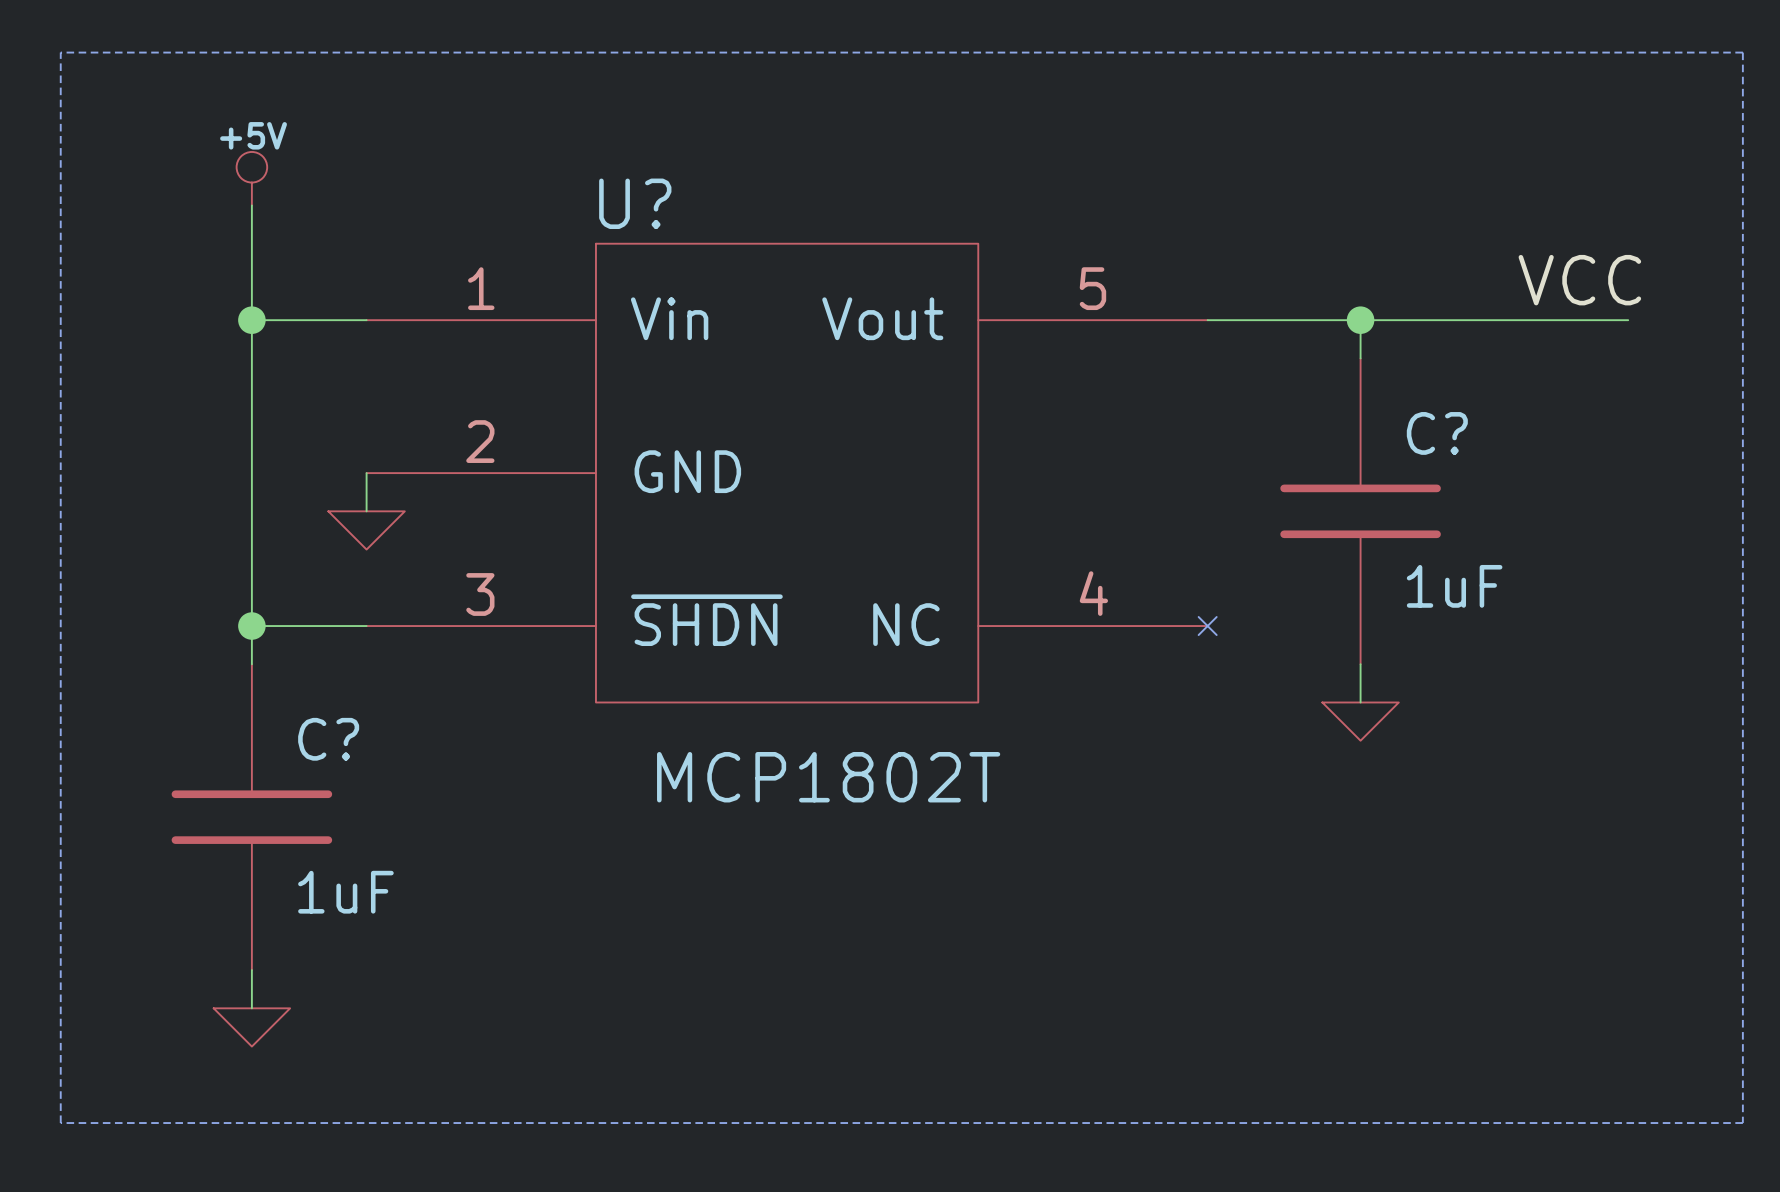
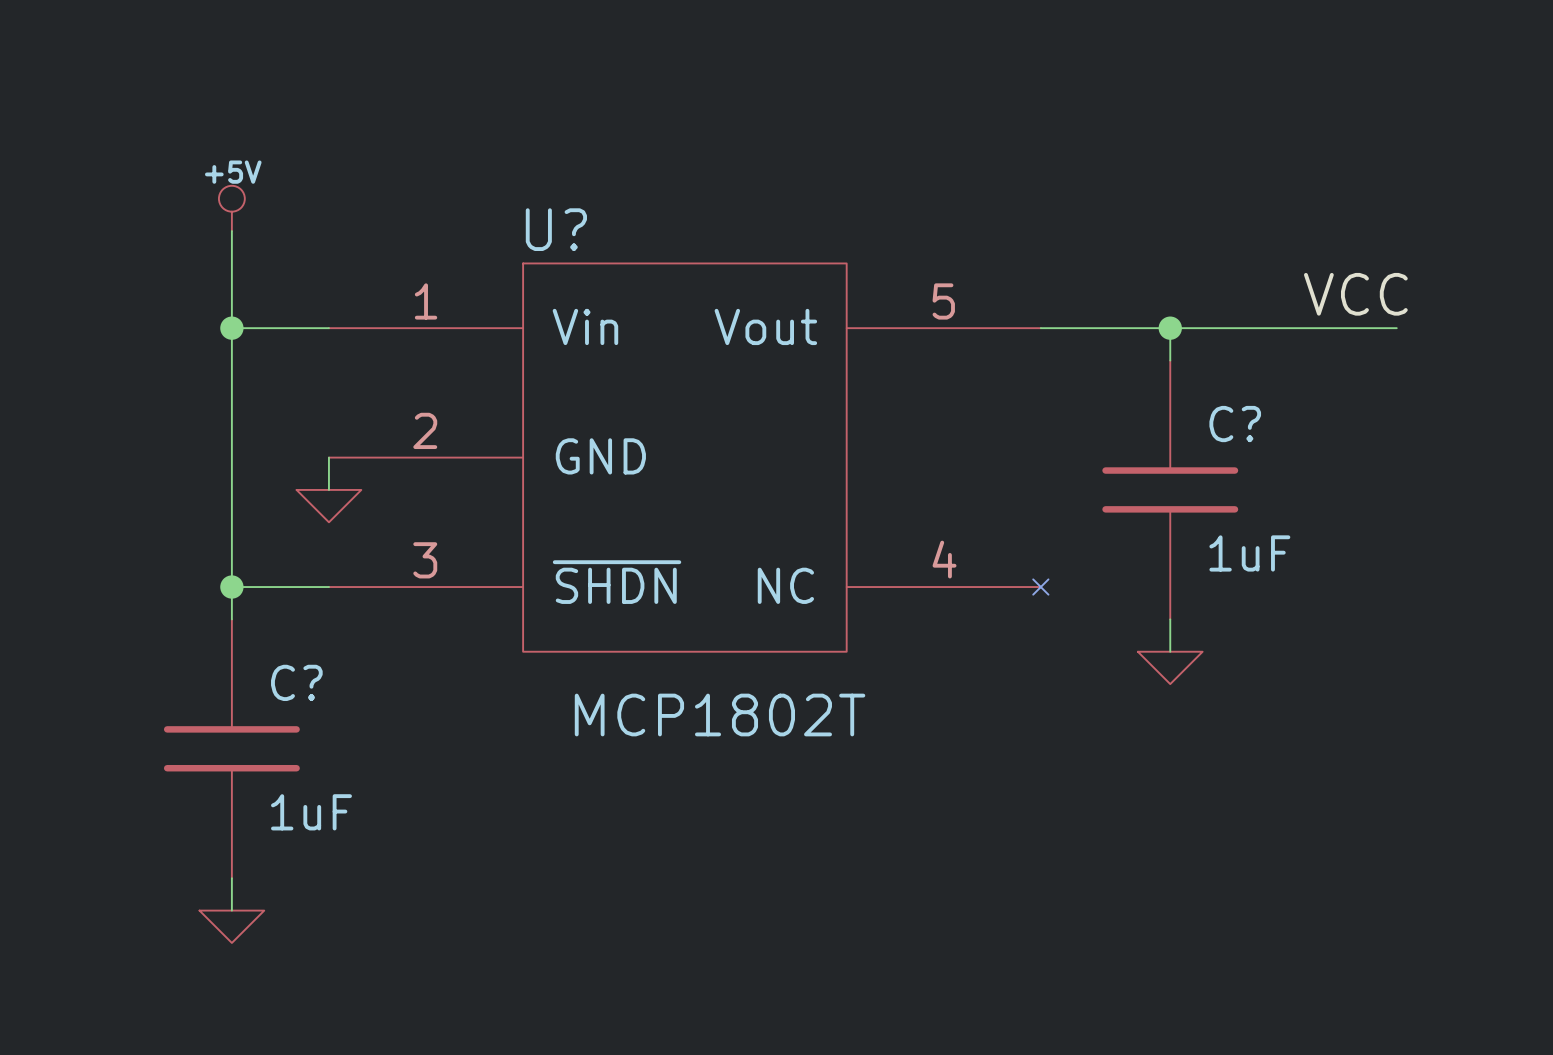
line: (60, 52) (1742, 52) (1742, 1123) (60, 1123) (60, 52) -> none

